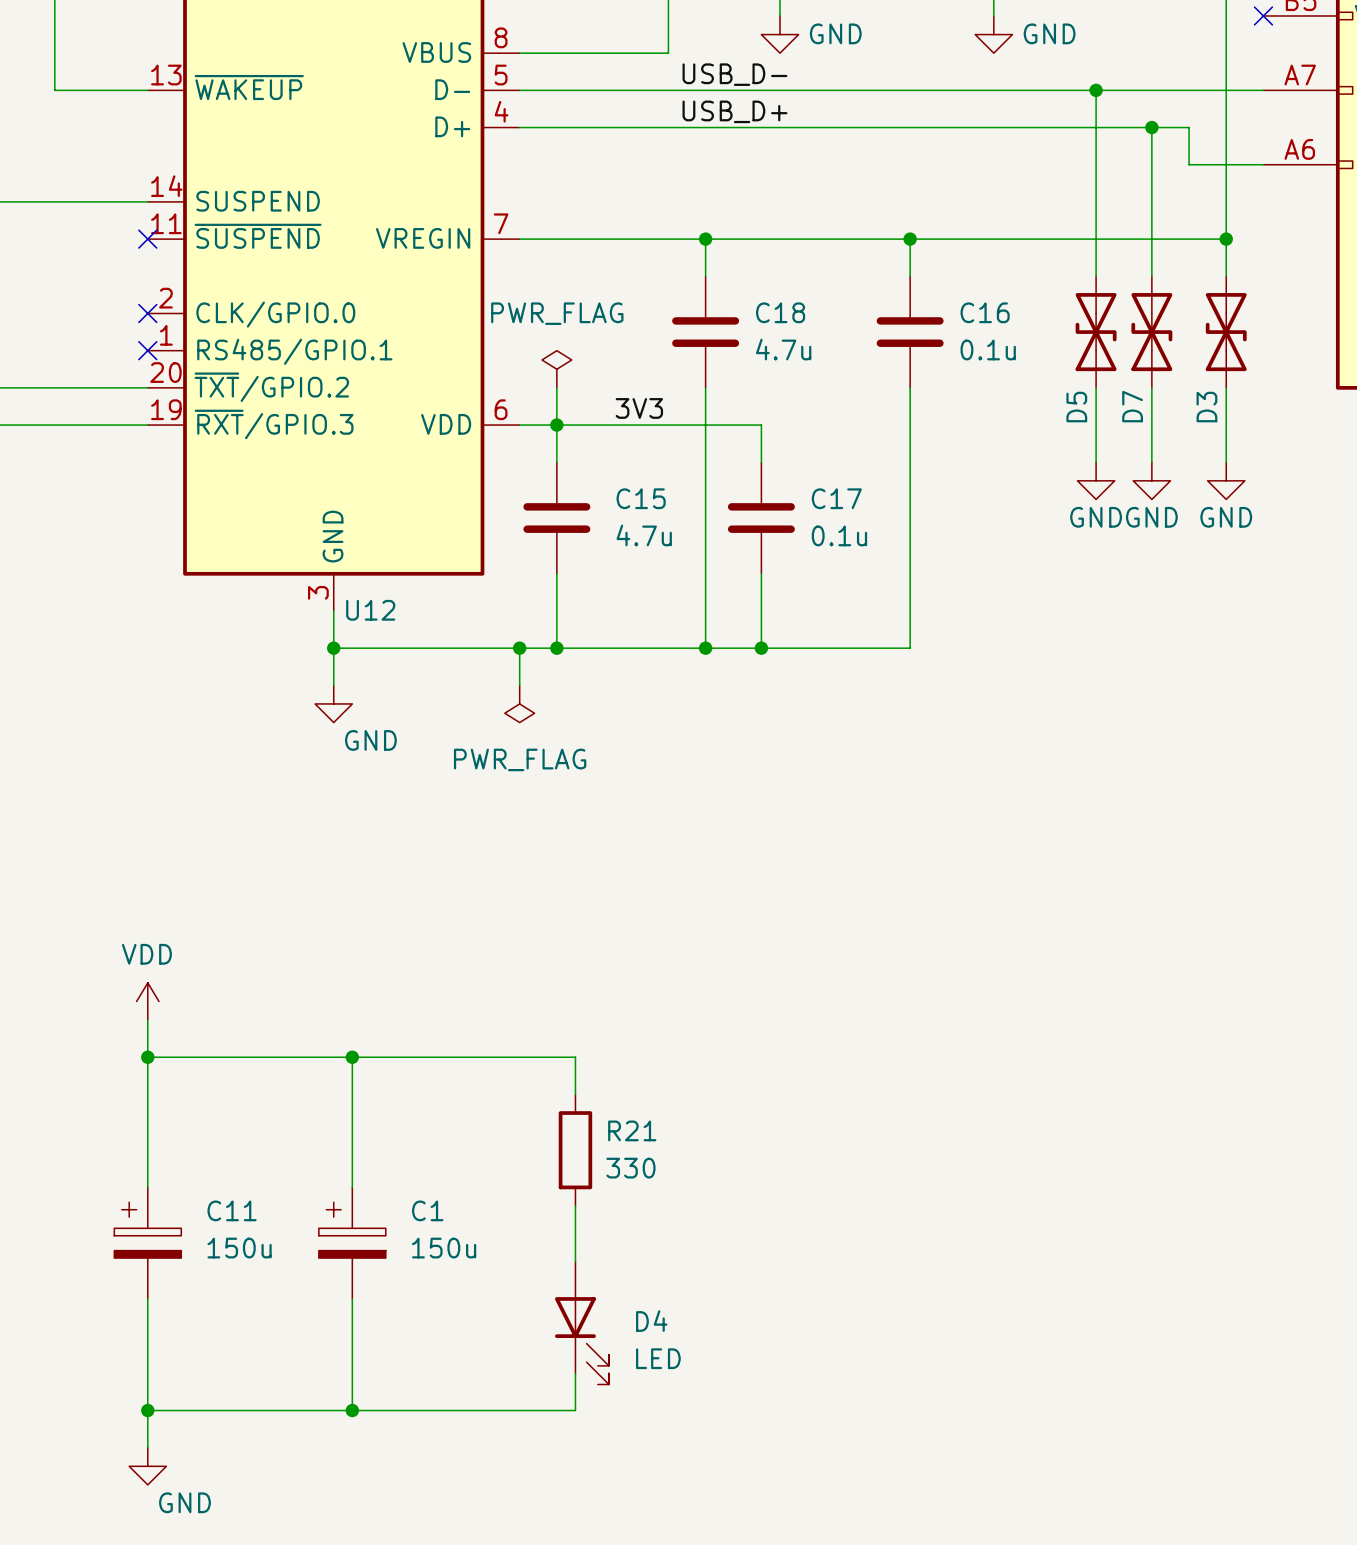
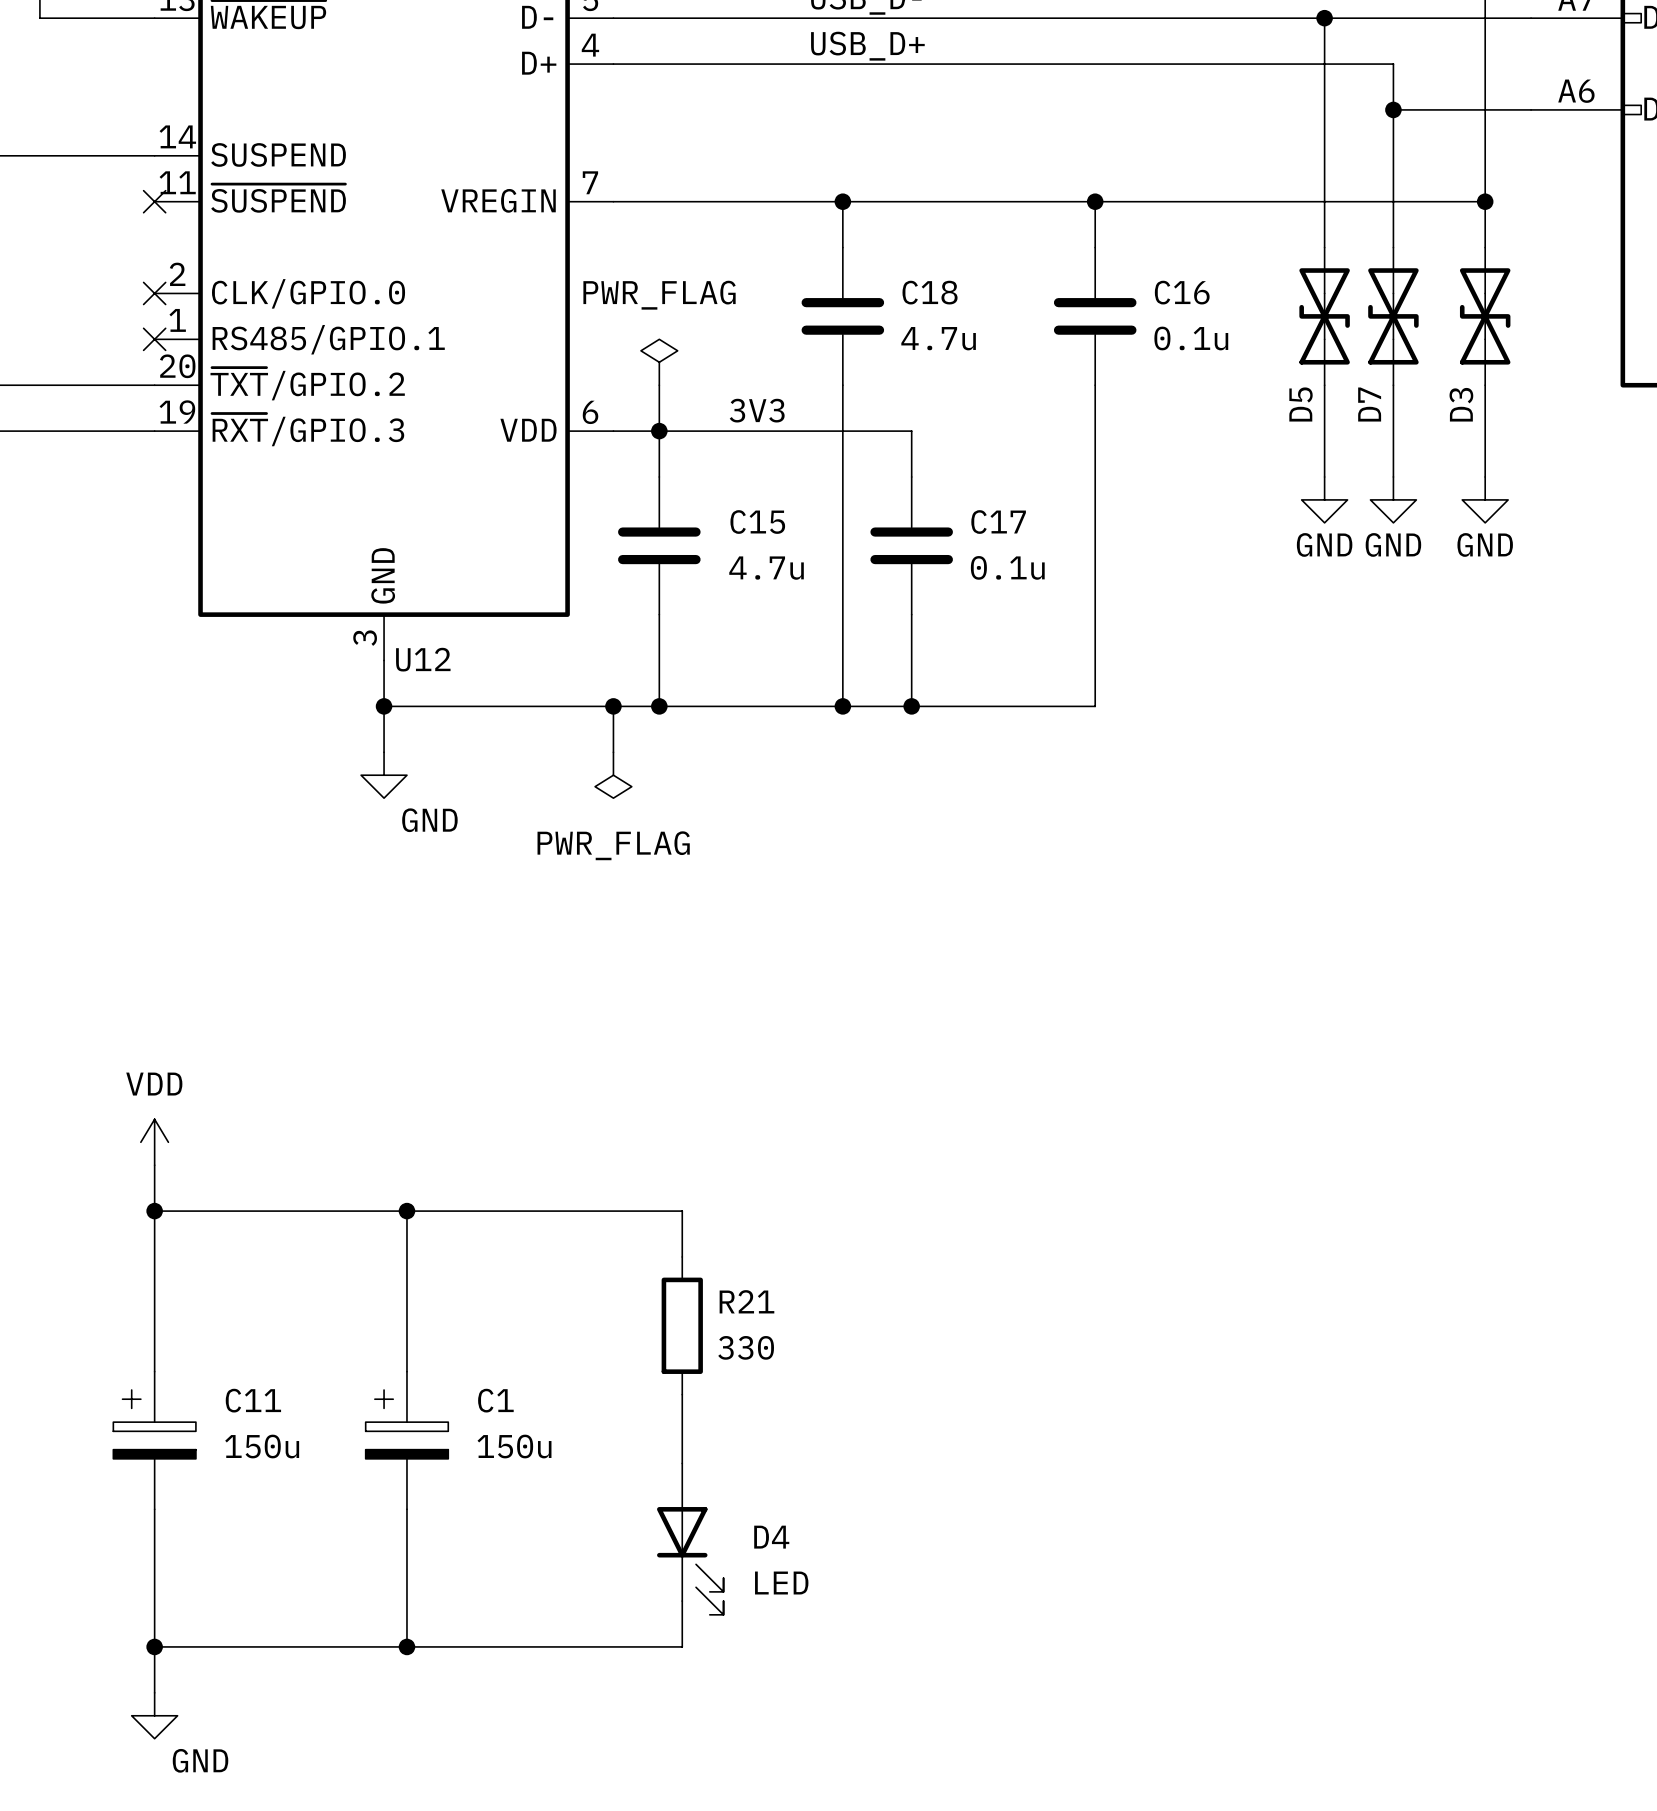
wire: (1151, 127) (1189, 127) (1189, 164) -> (1393, 109) (1439, 109)
junction position: (1151, 127) -> (1393, 109)

